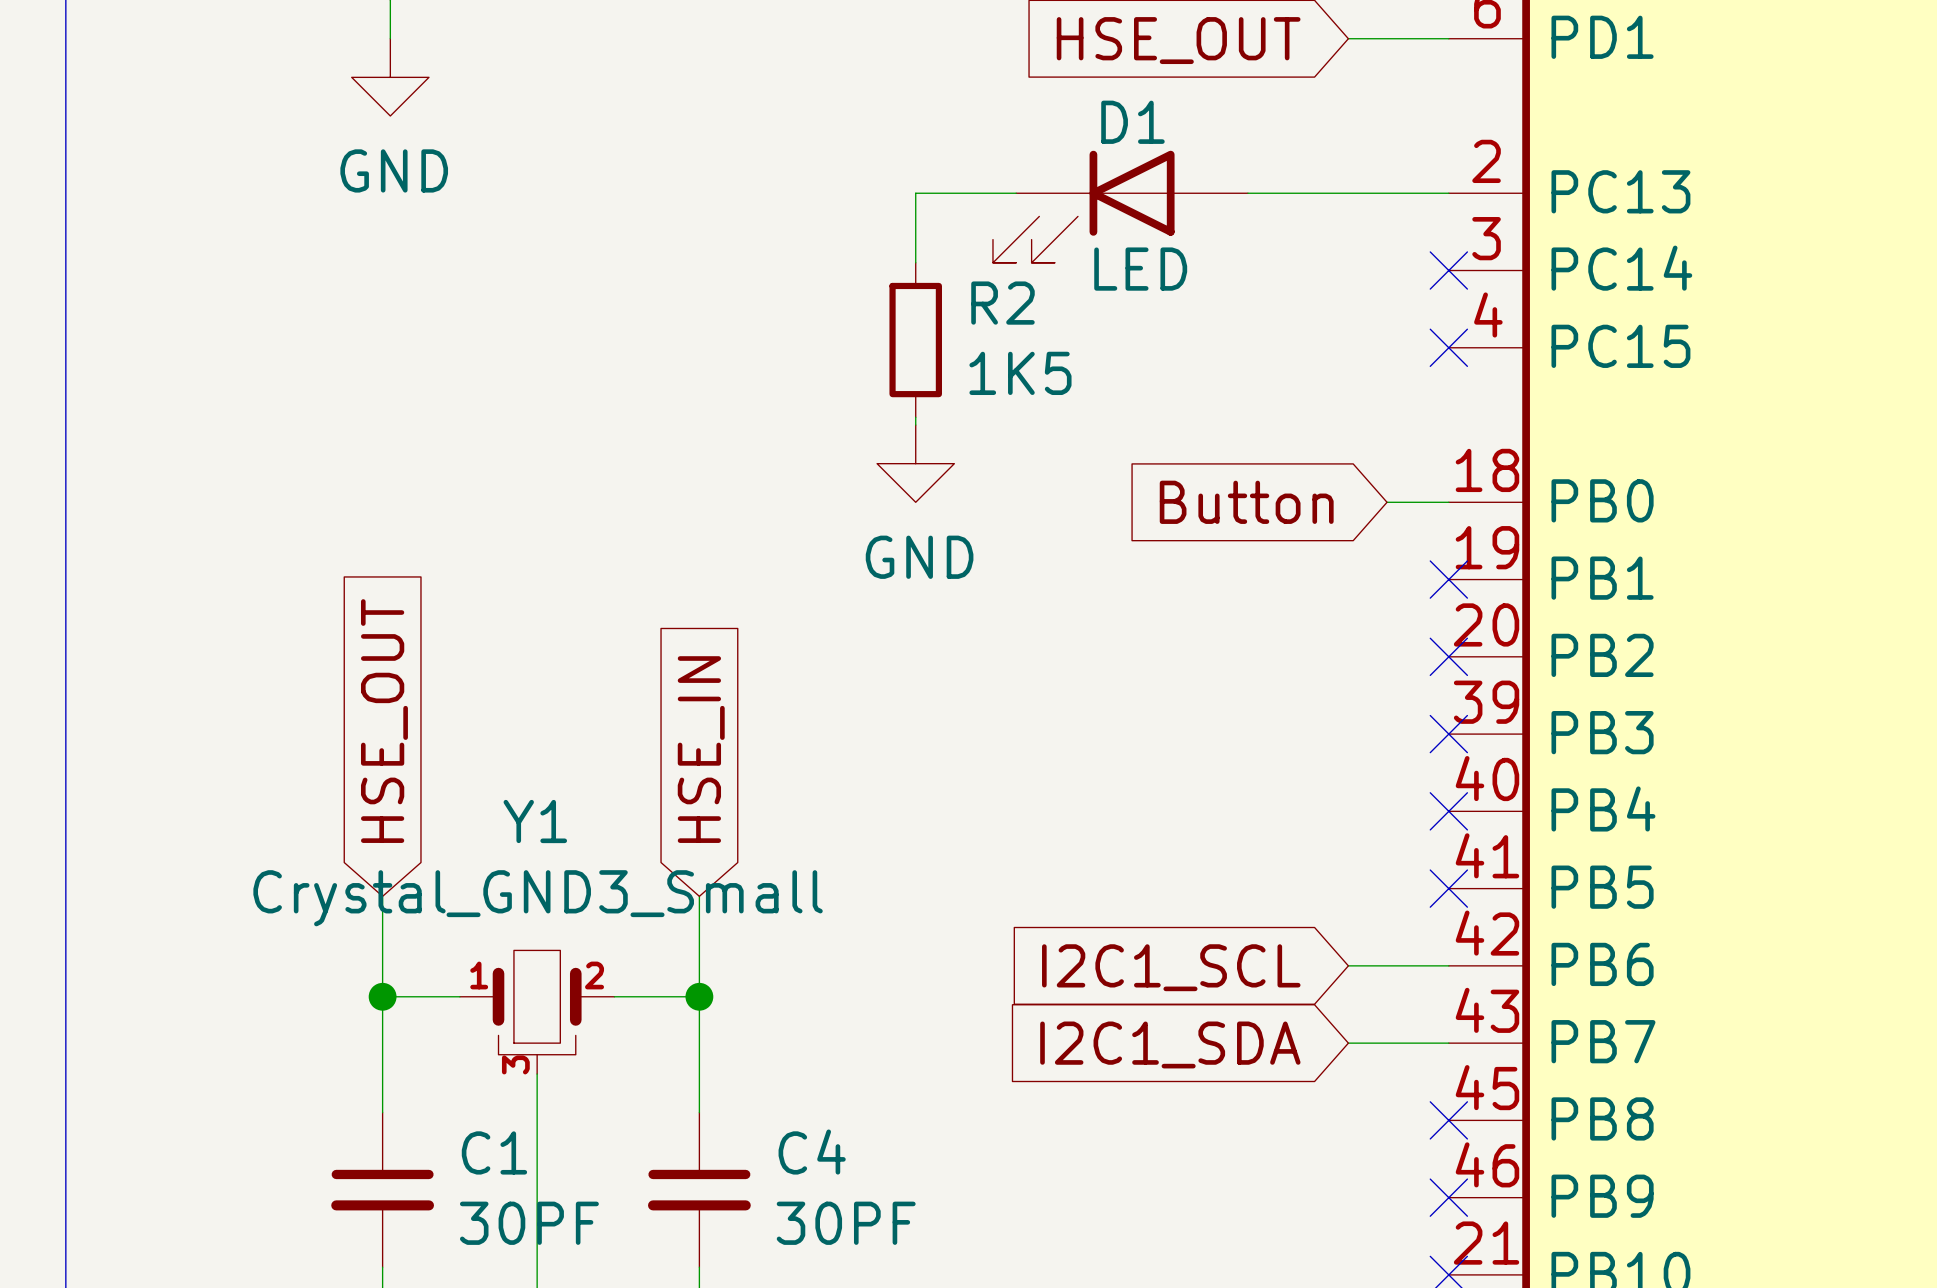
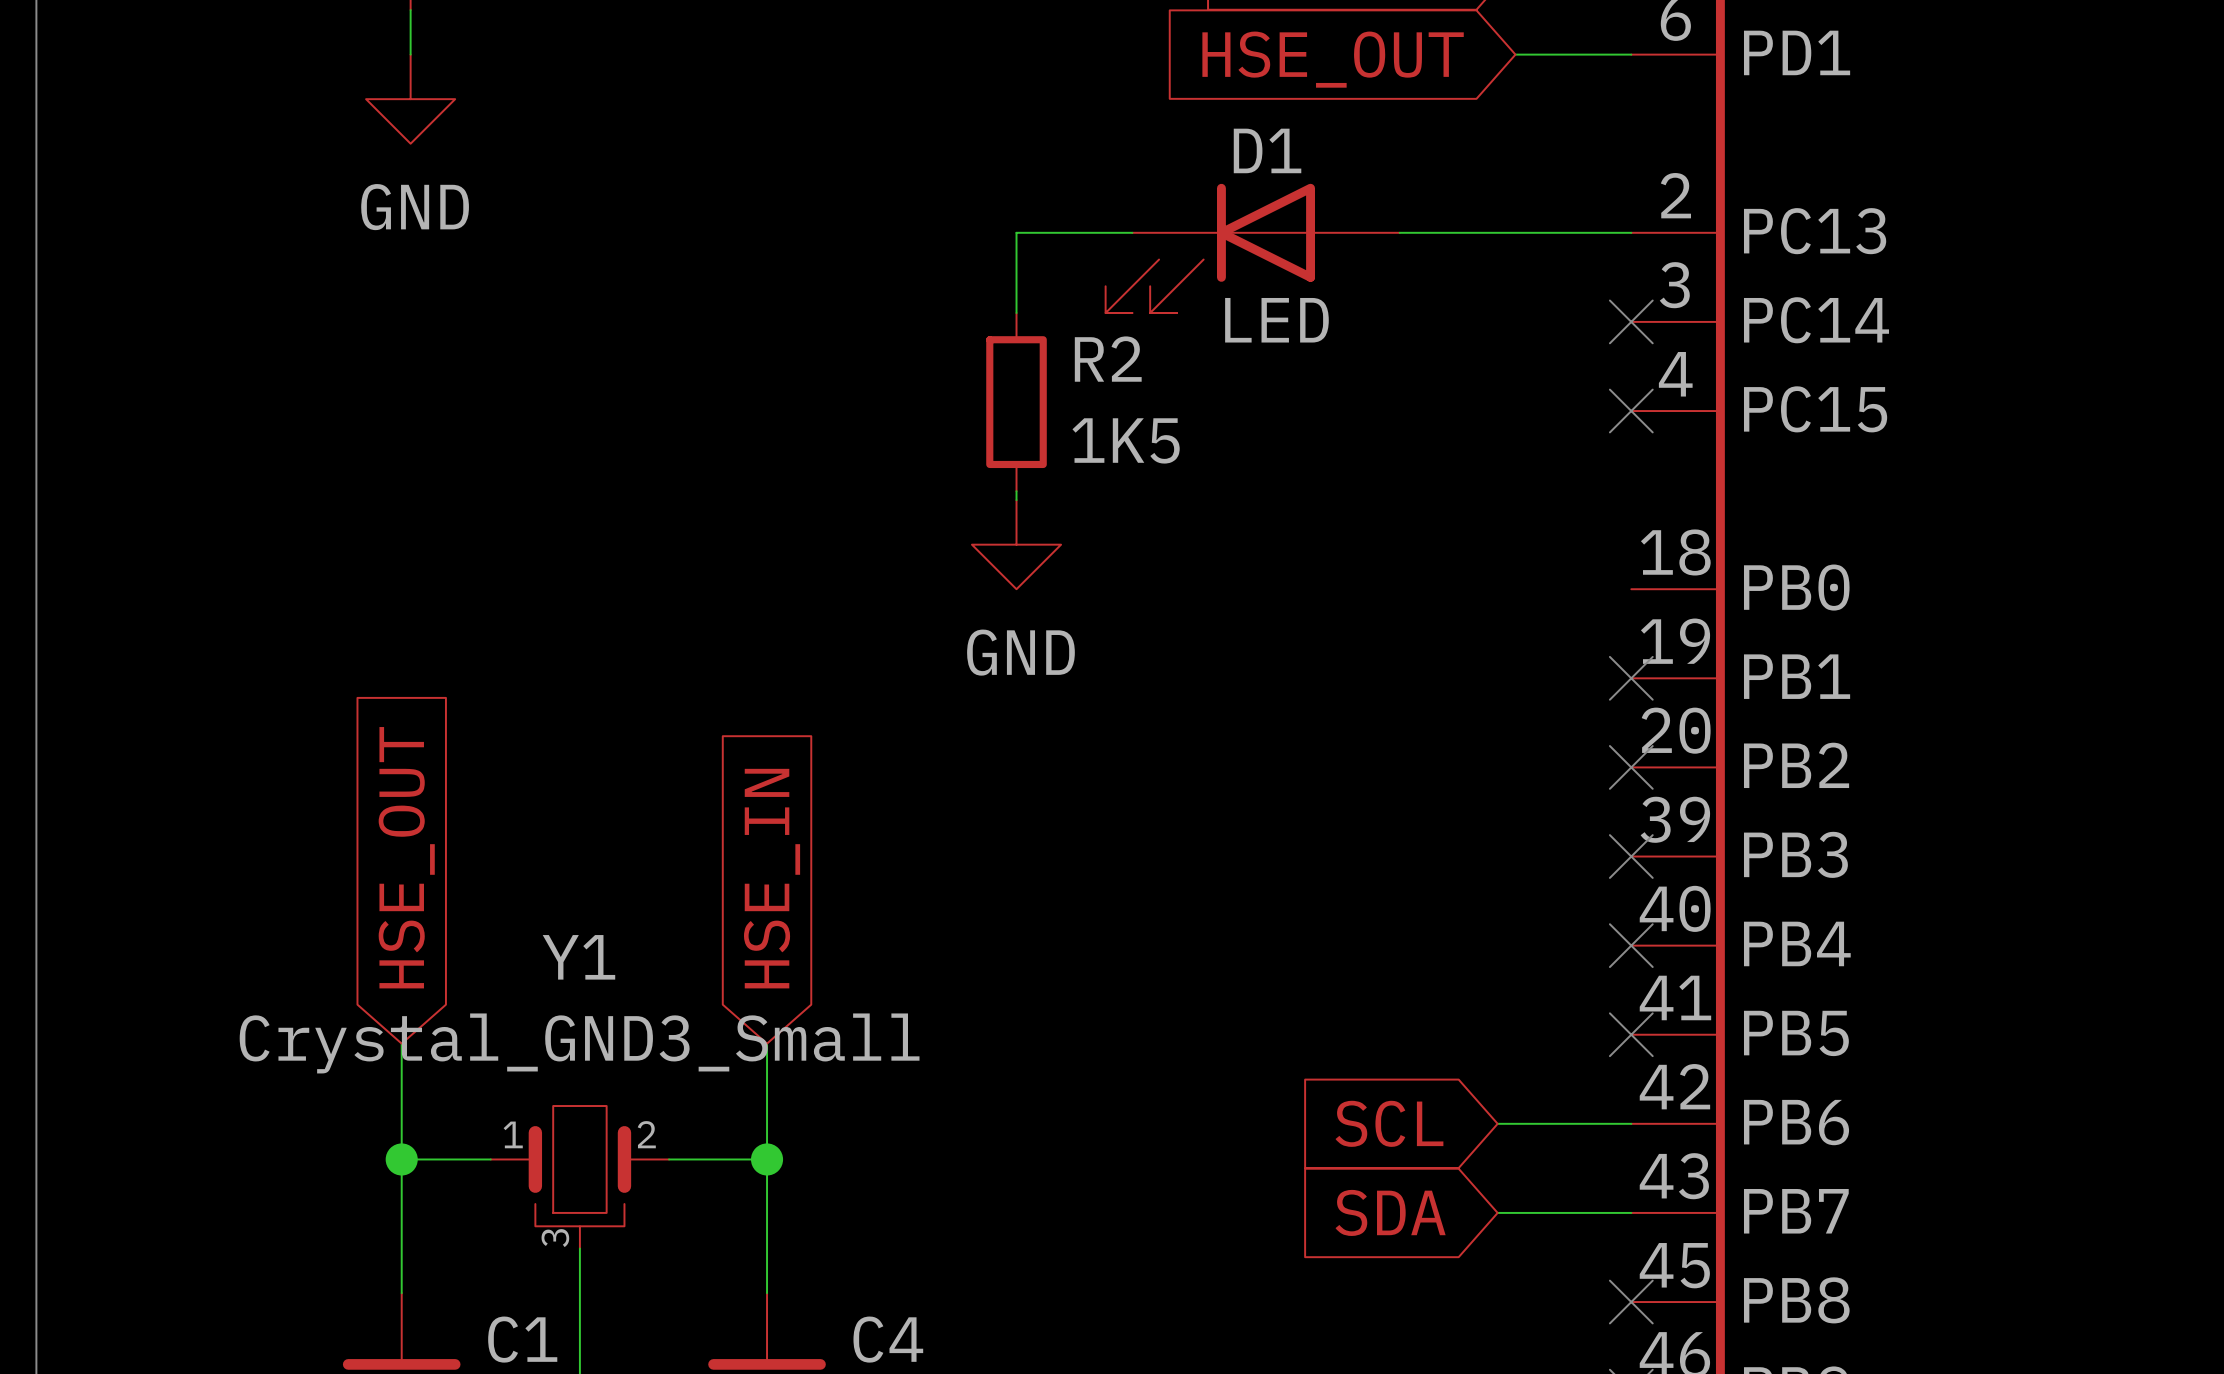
global label: Button (1246, 502) -> none
wire: (1387, 502) (1448, 502) -> none
wire: none -> (1497, 1123) (1515, 1123)
global label: I2C1_SCL (1171, 967) -> SCL (1389, 1123)
wire: none -> (1497, 1212) (1515, 1212)
global label: I2C1_SDA (1170, 1044) -> SDA (1390, 1212)

